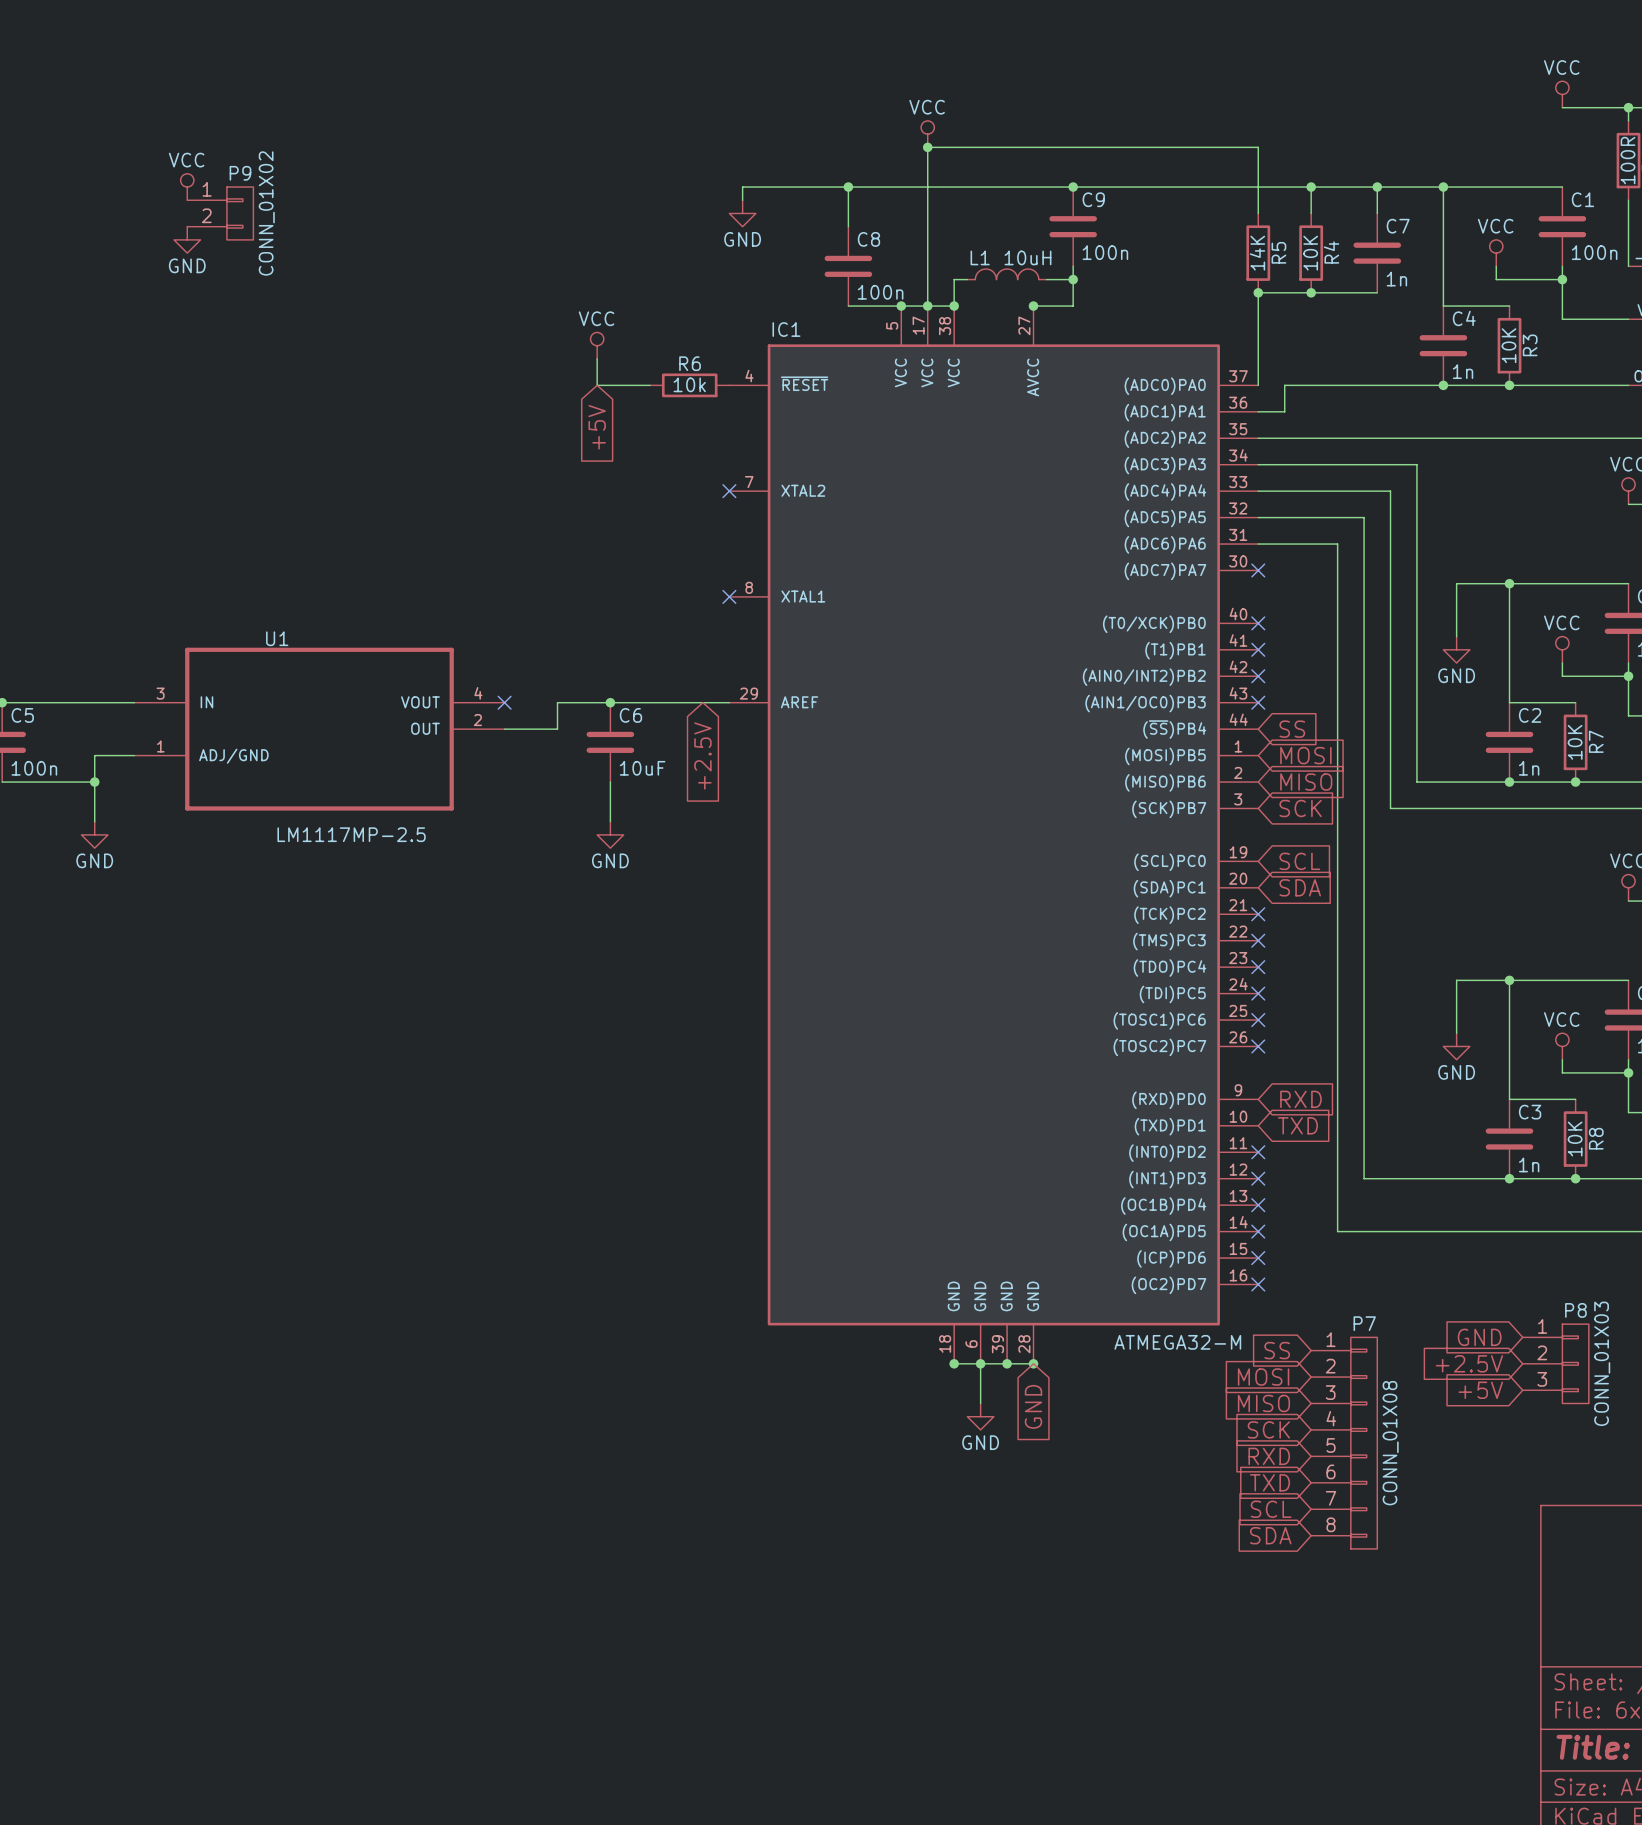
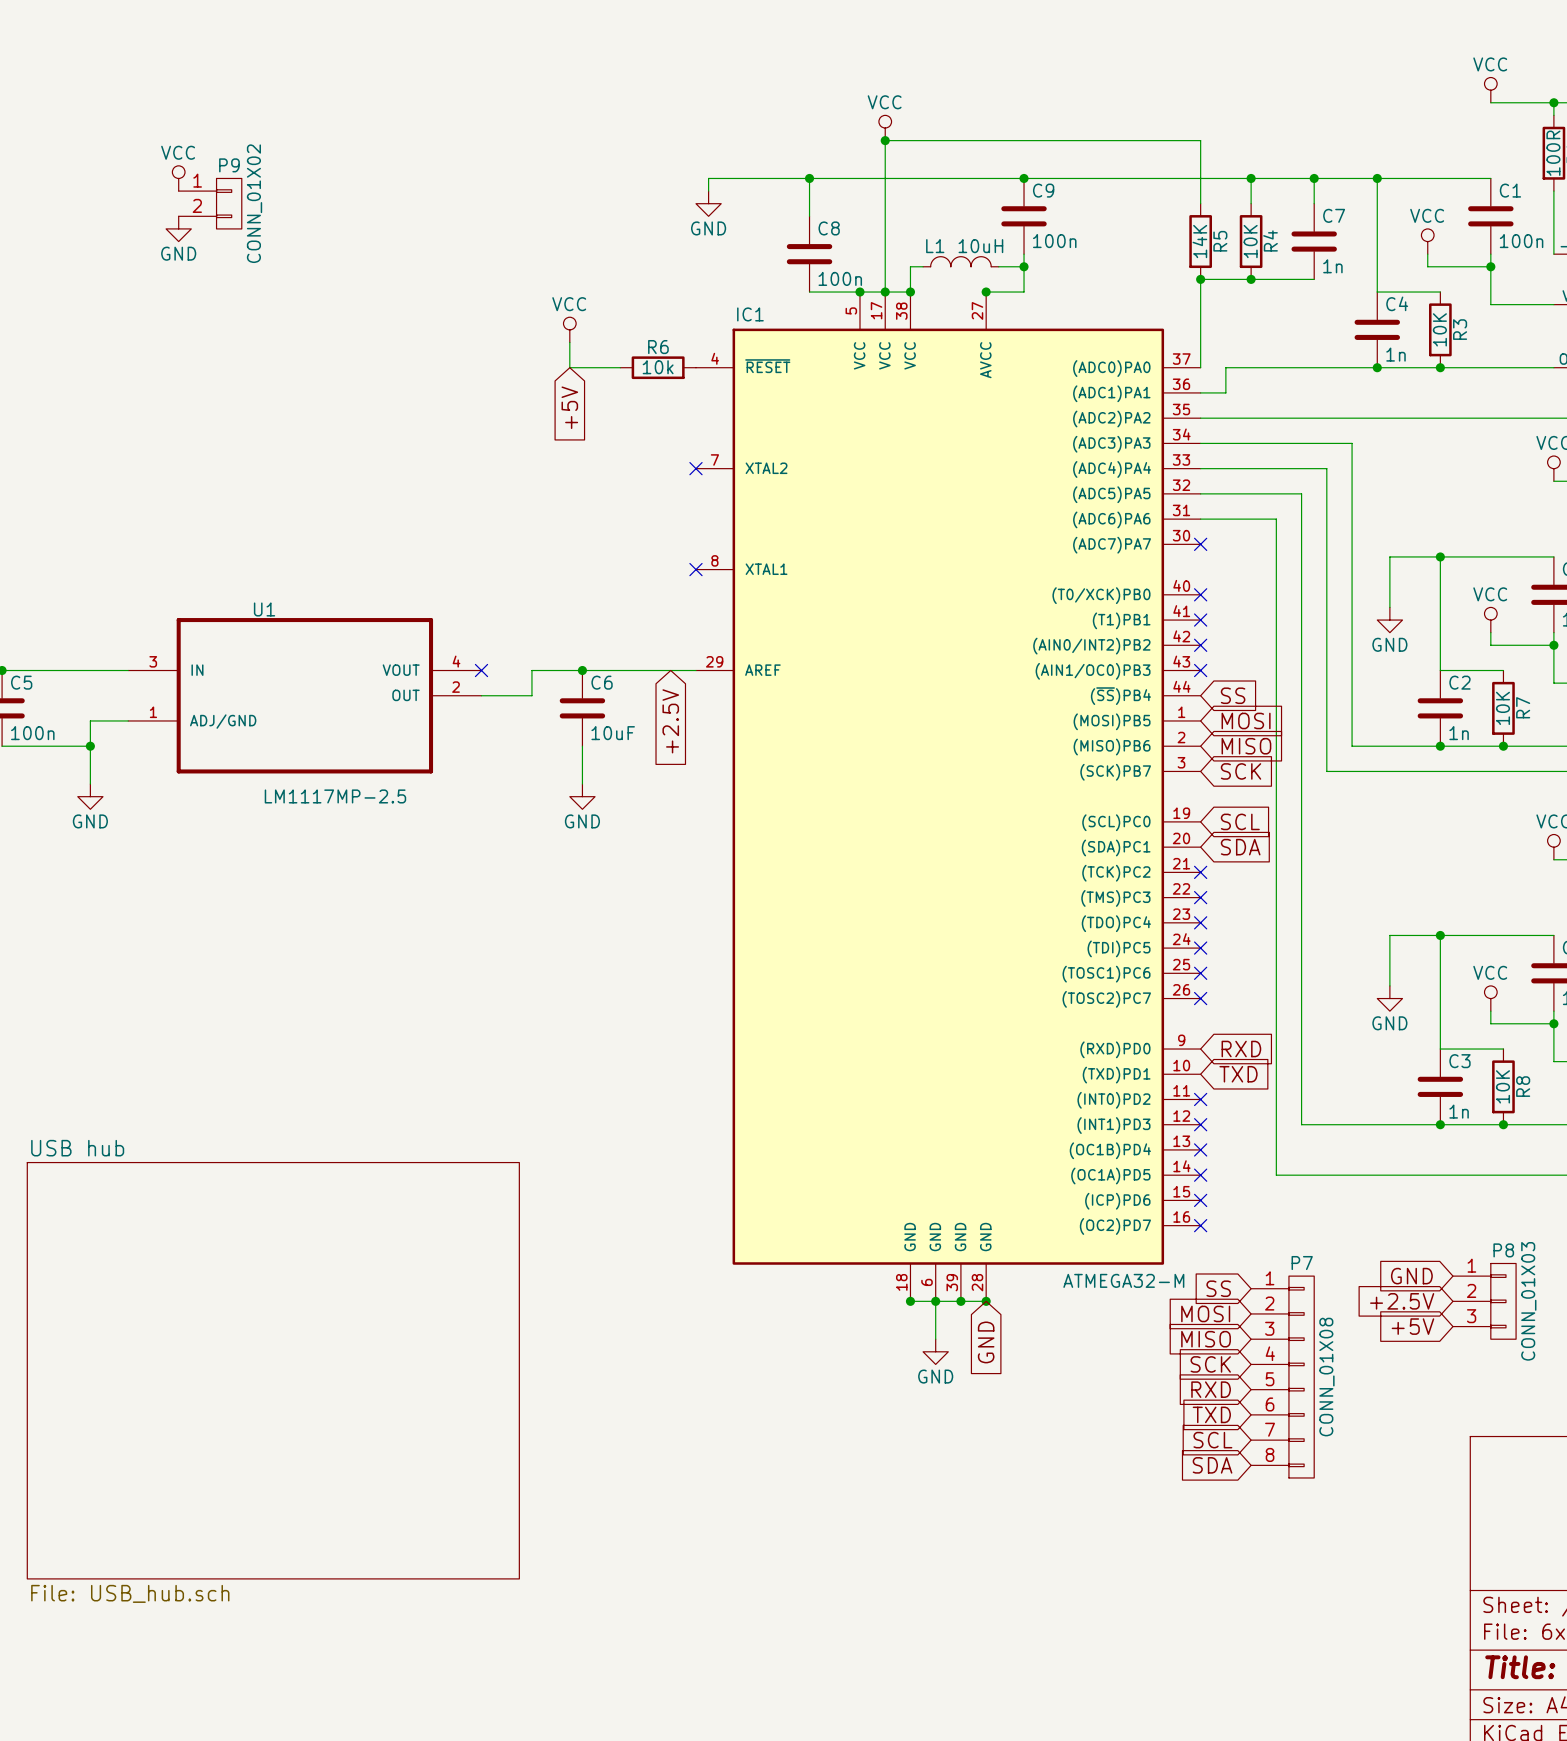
sheet USB hub: none -> File: USB_hub.sch (273, 1370)

